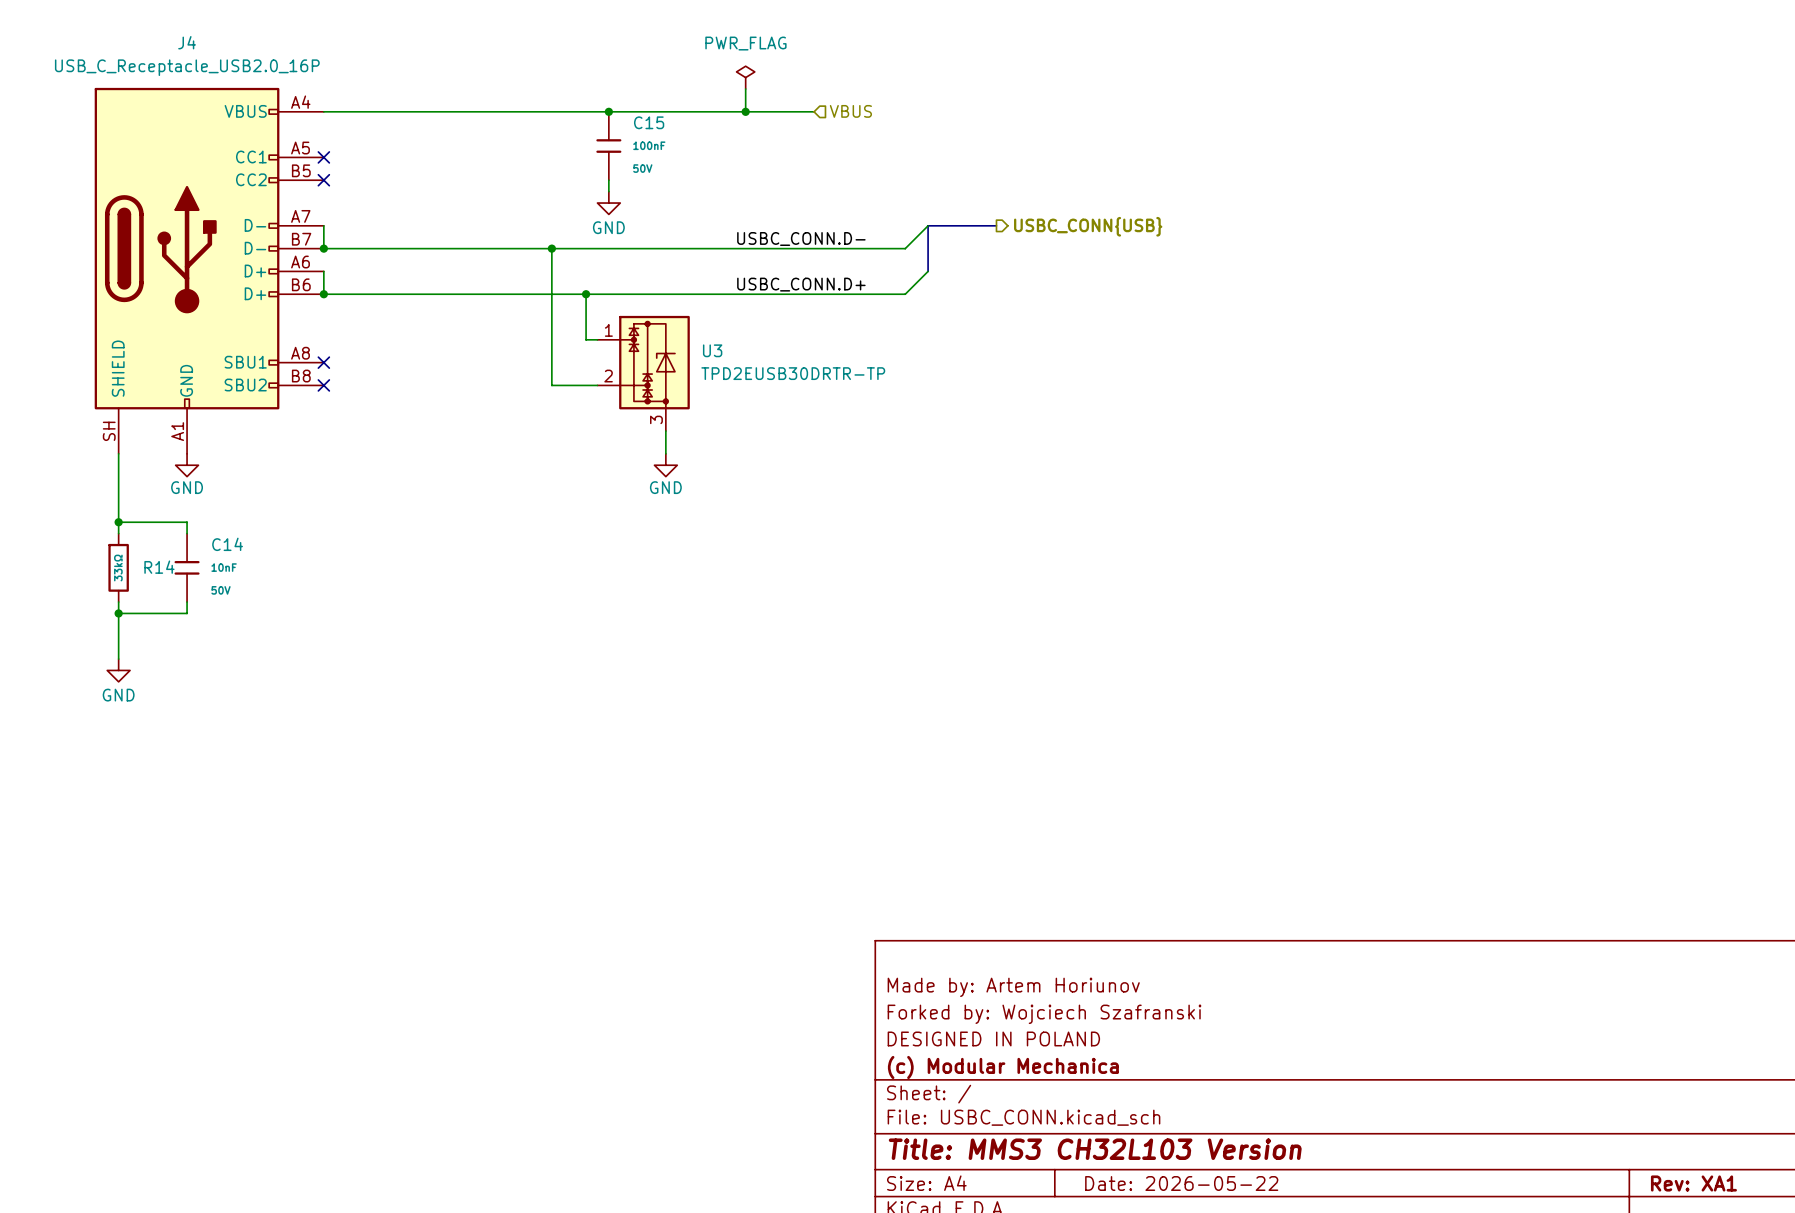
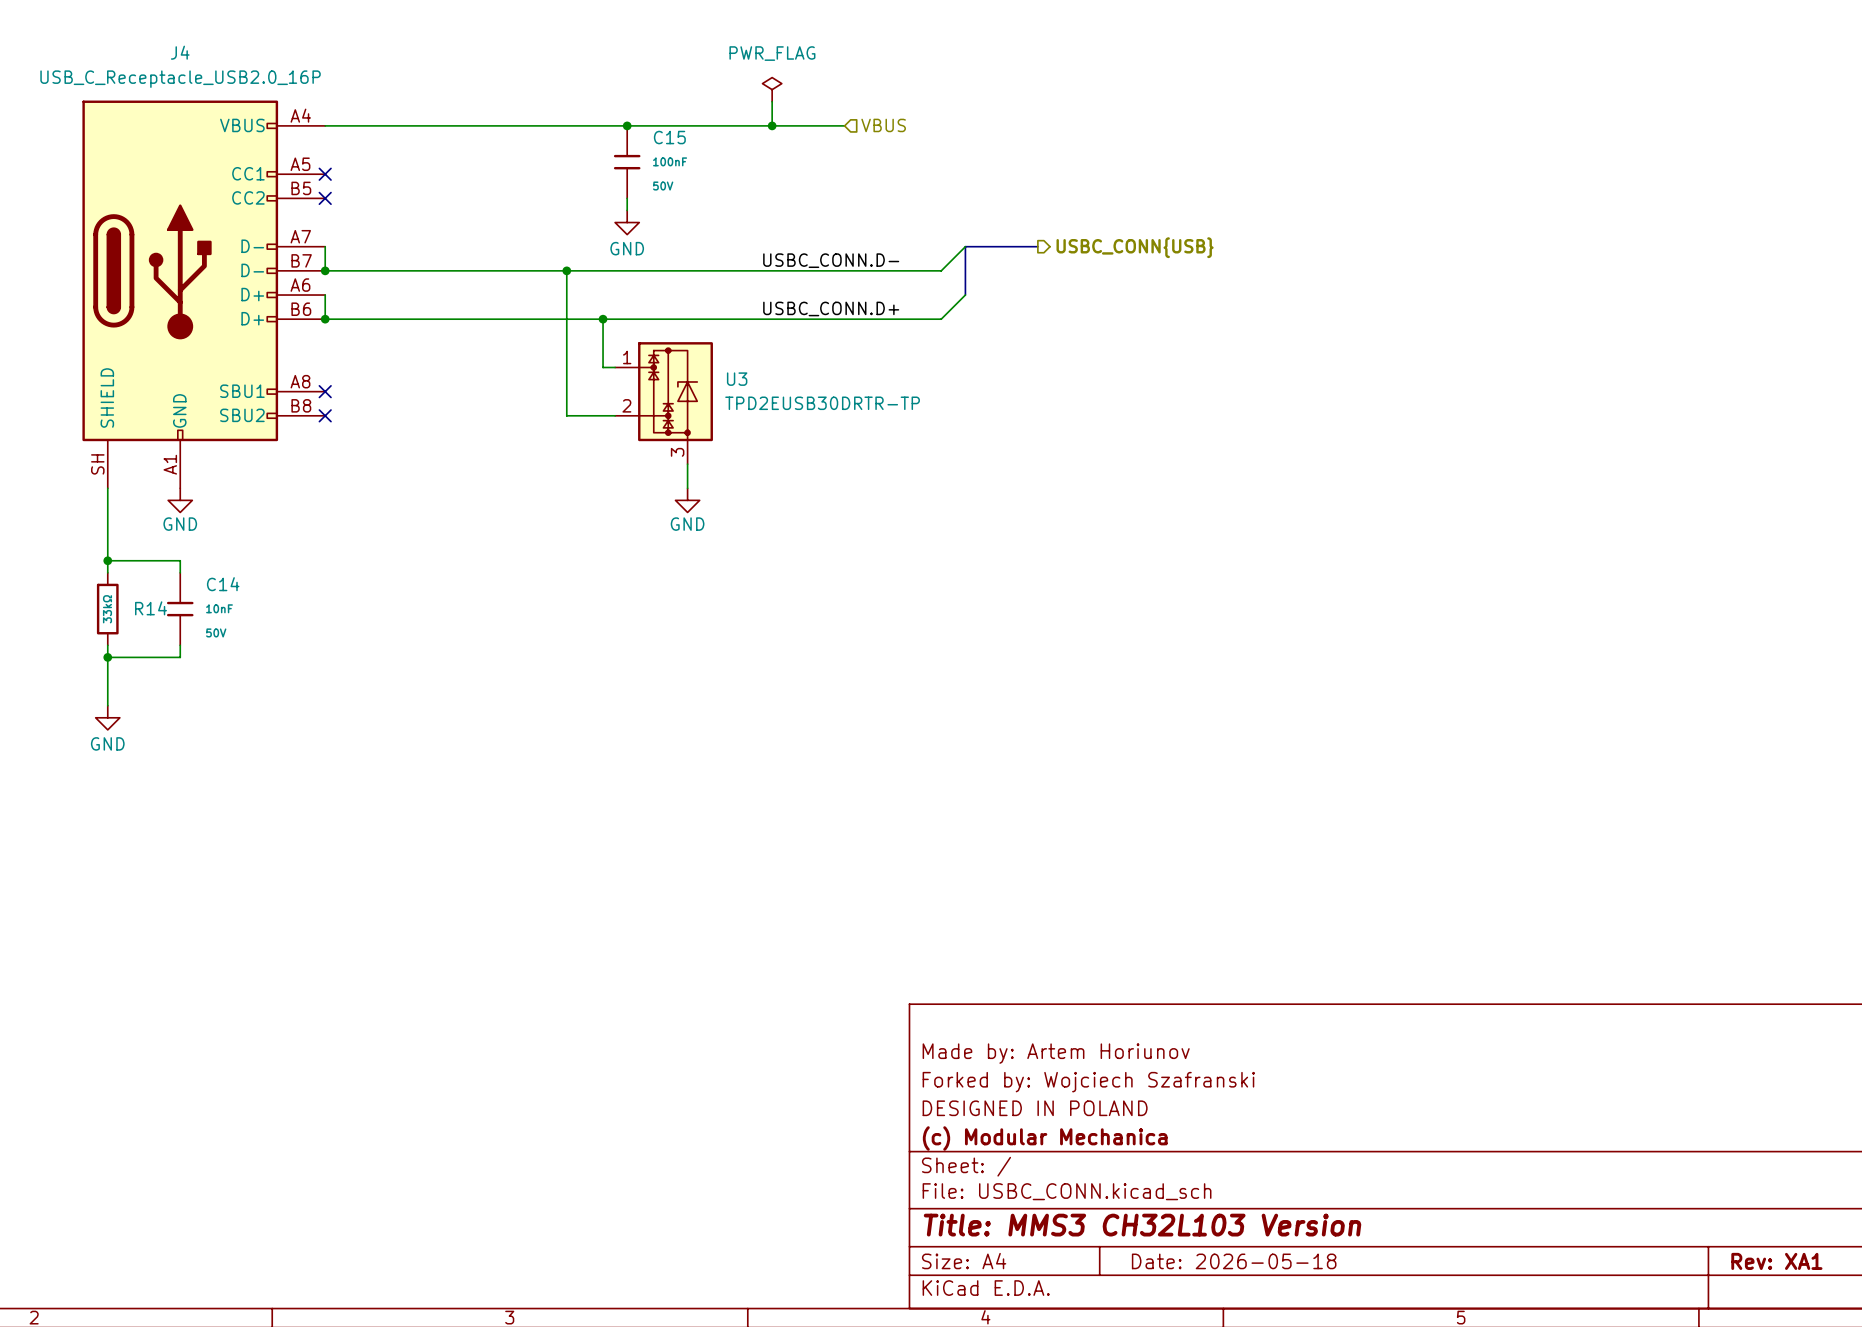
title block: Date: 2026-05-22 (1181, 1183) -> Date: 2026-05-18 (1234, 1261)

